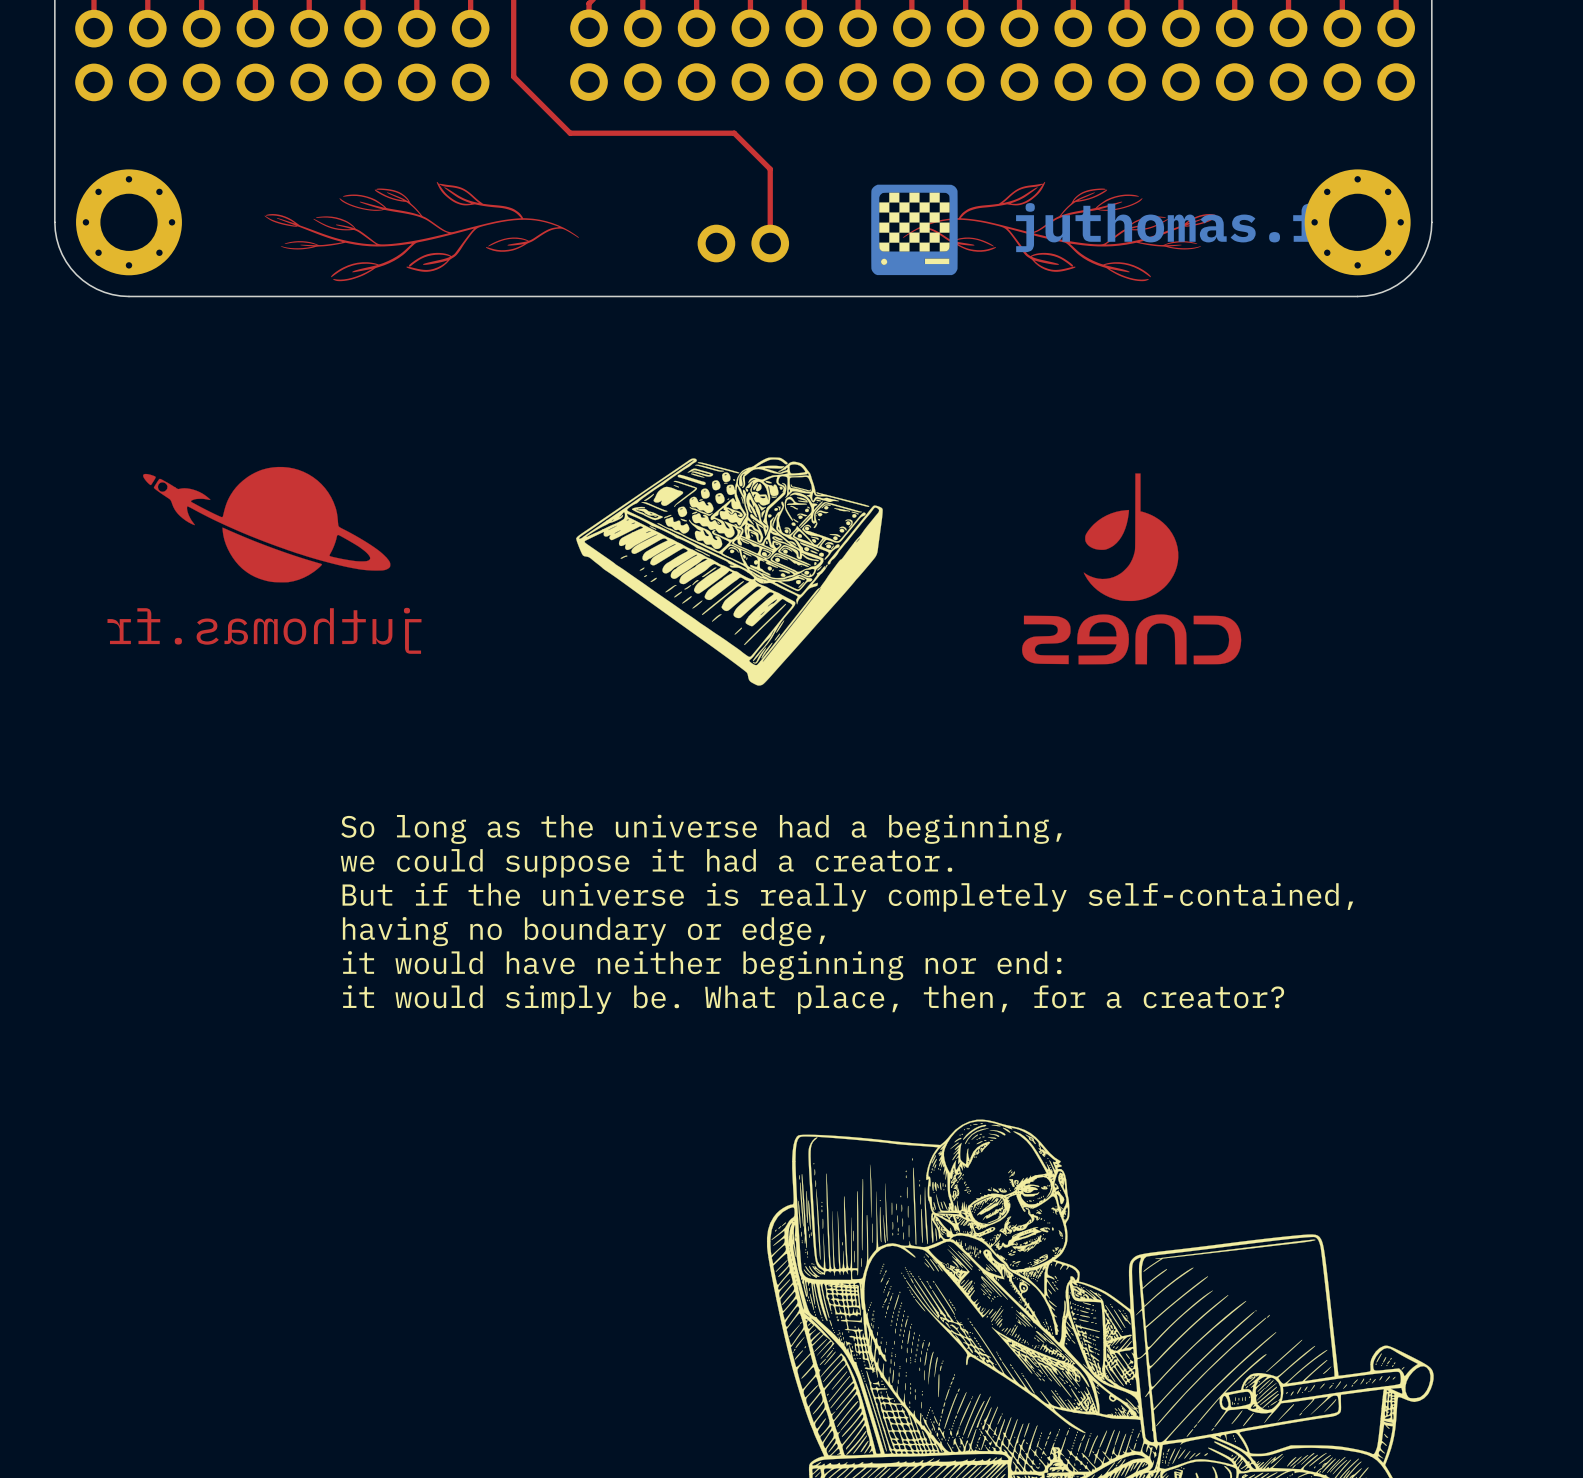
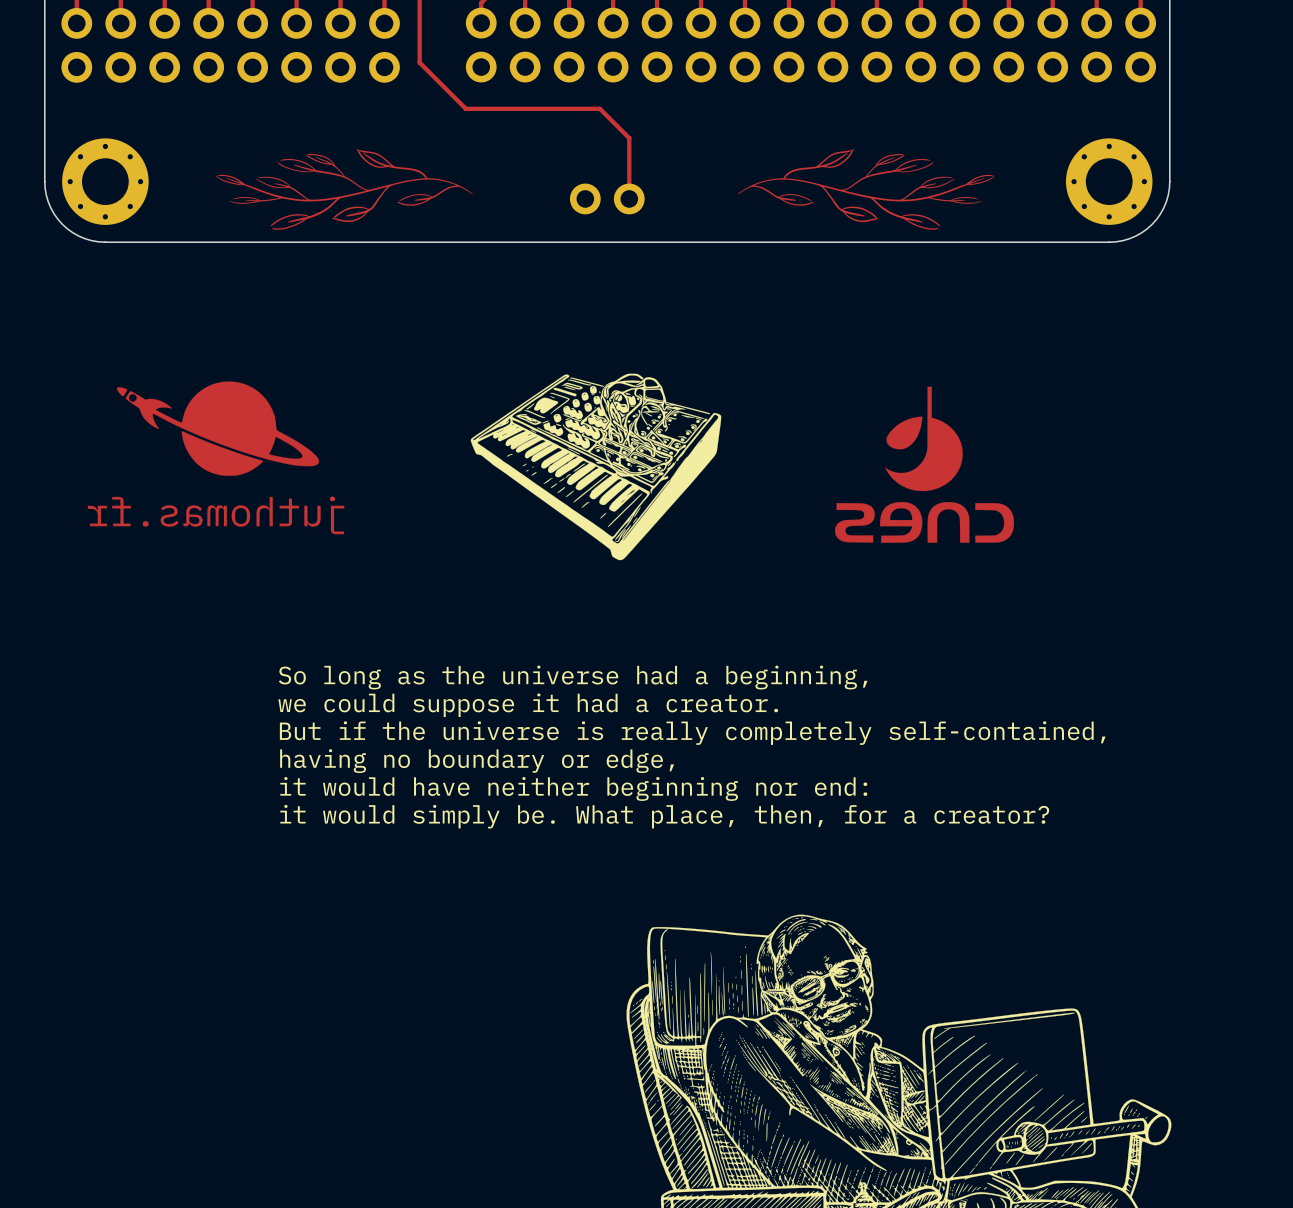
drawing: [871, 184, 958, 276] -> none

